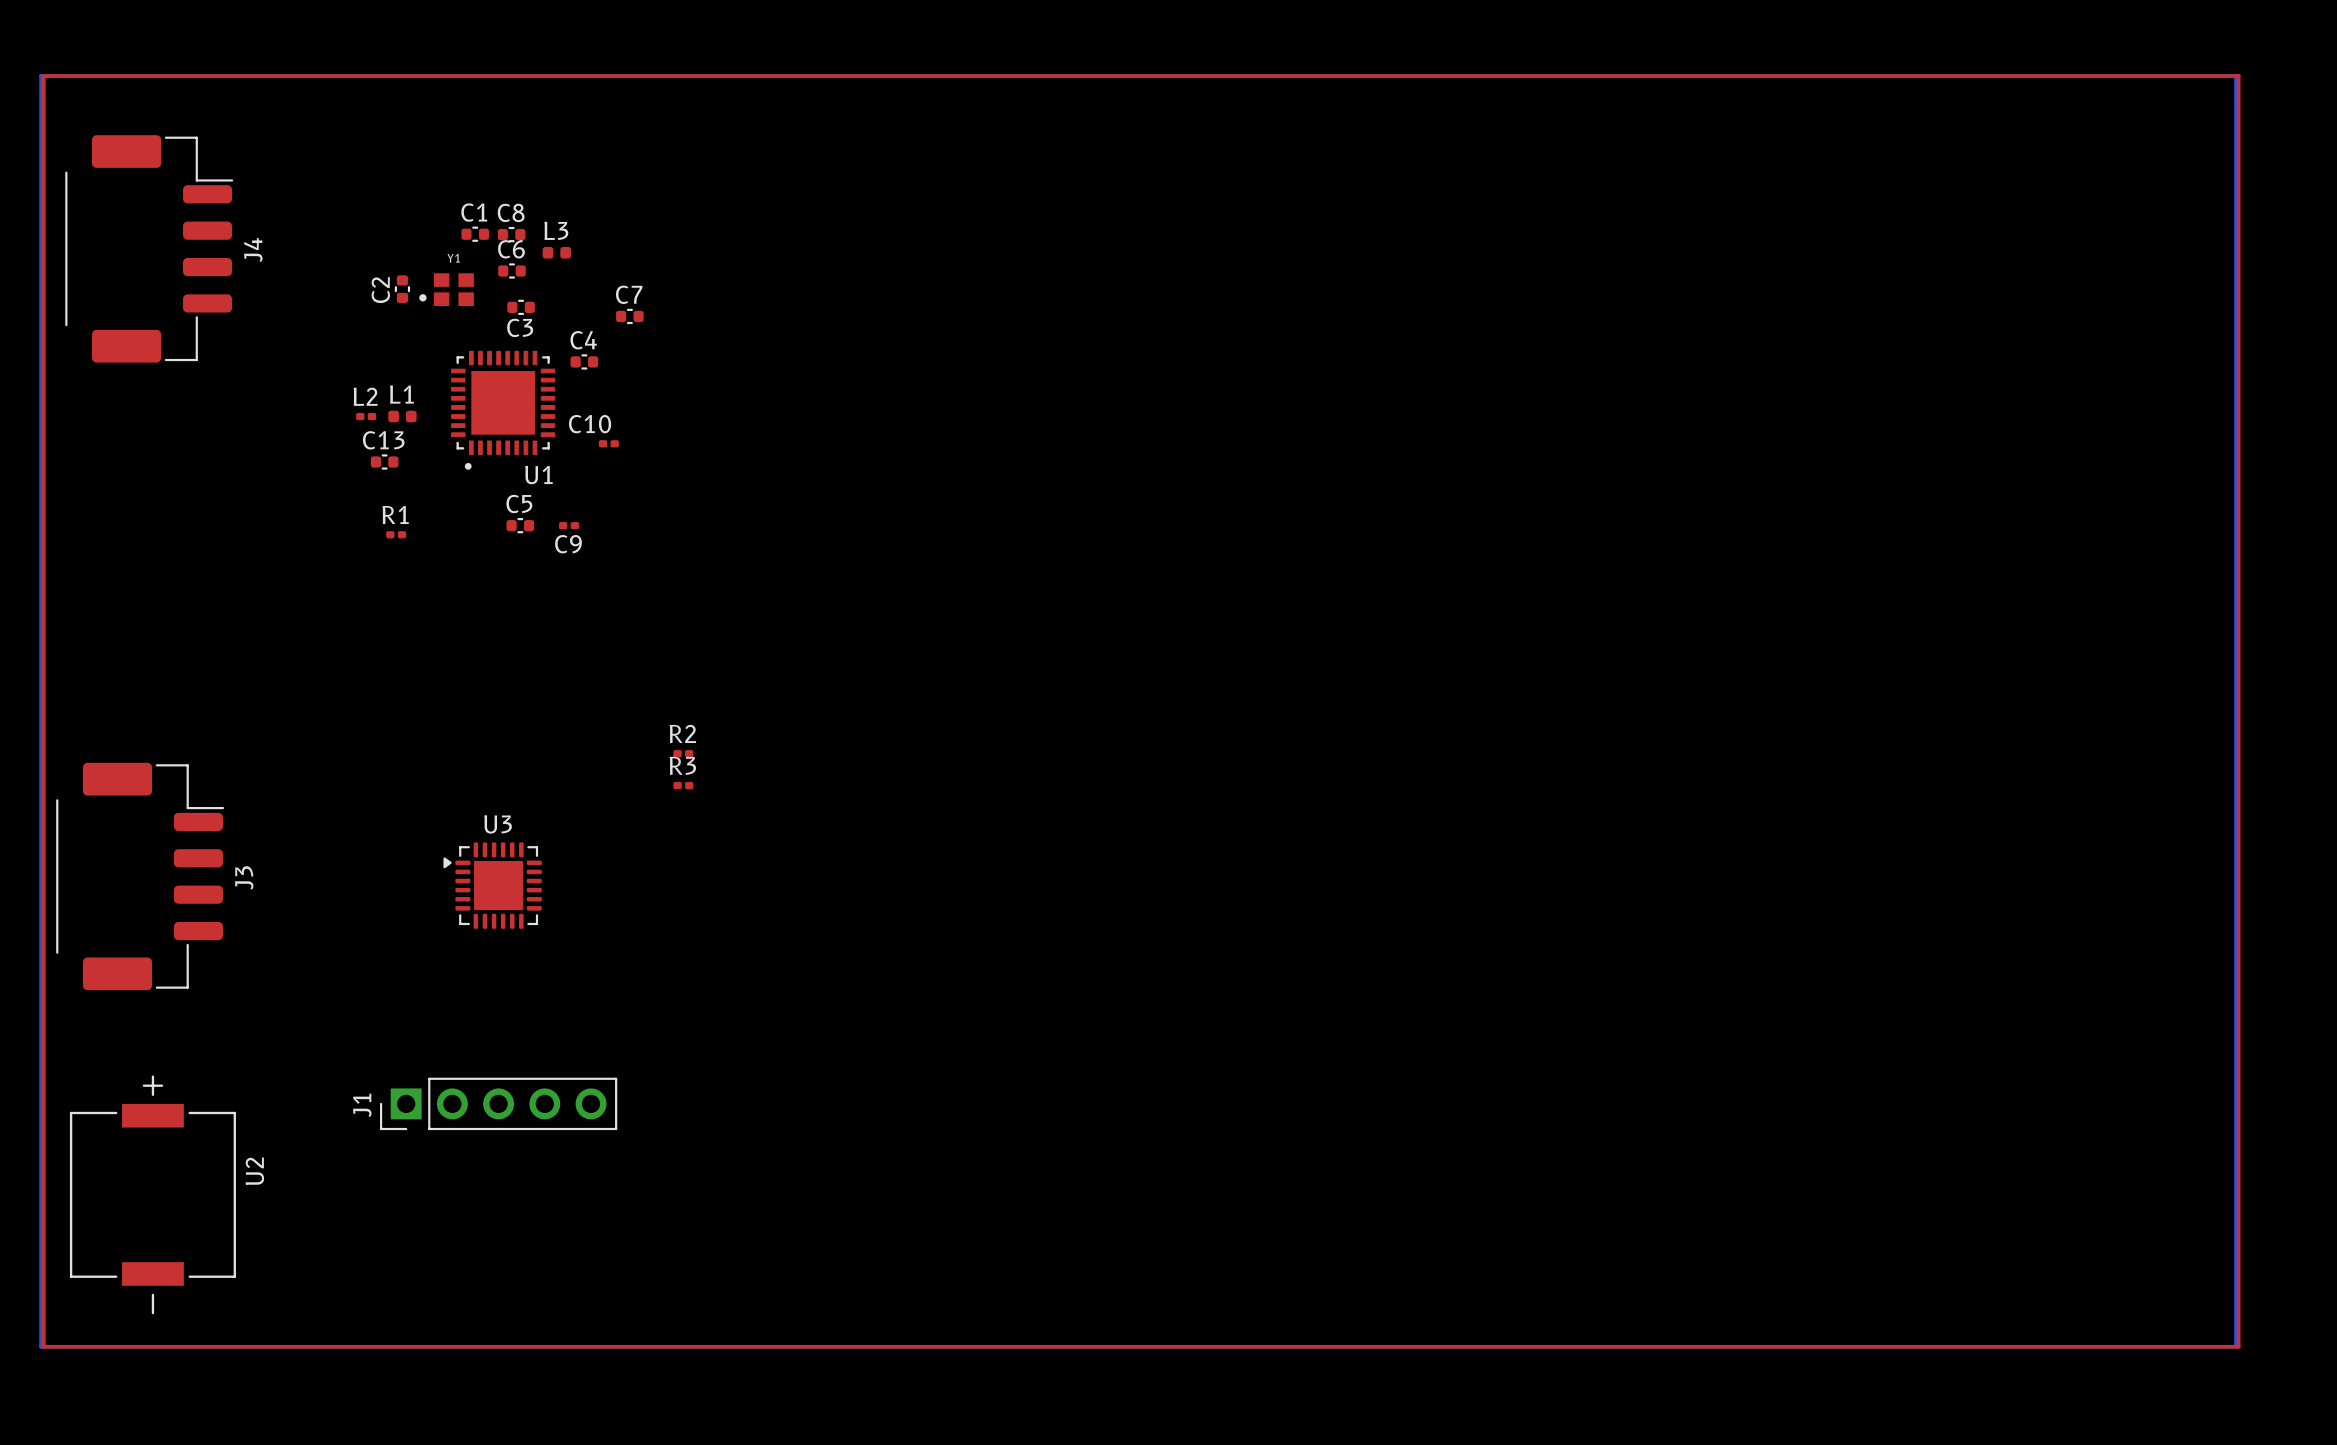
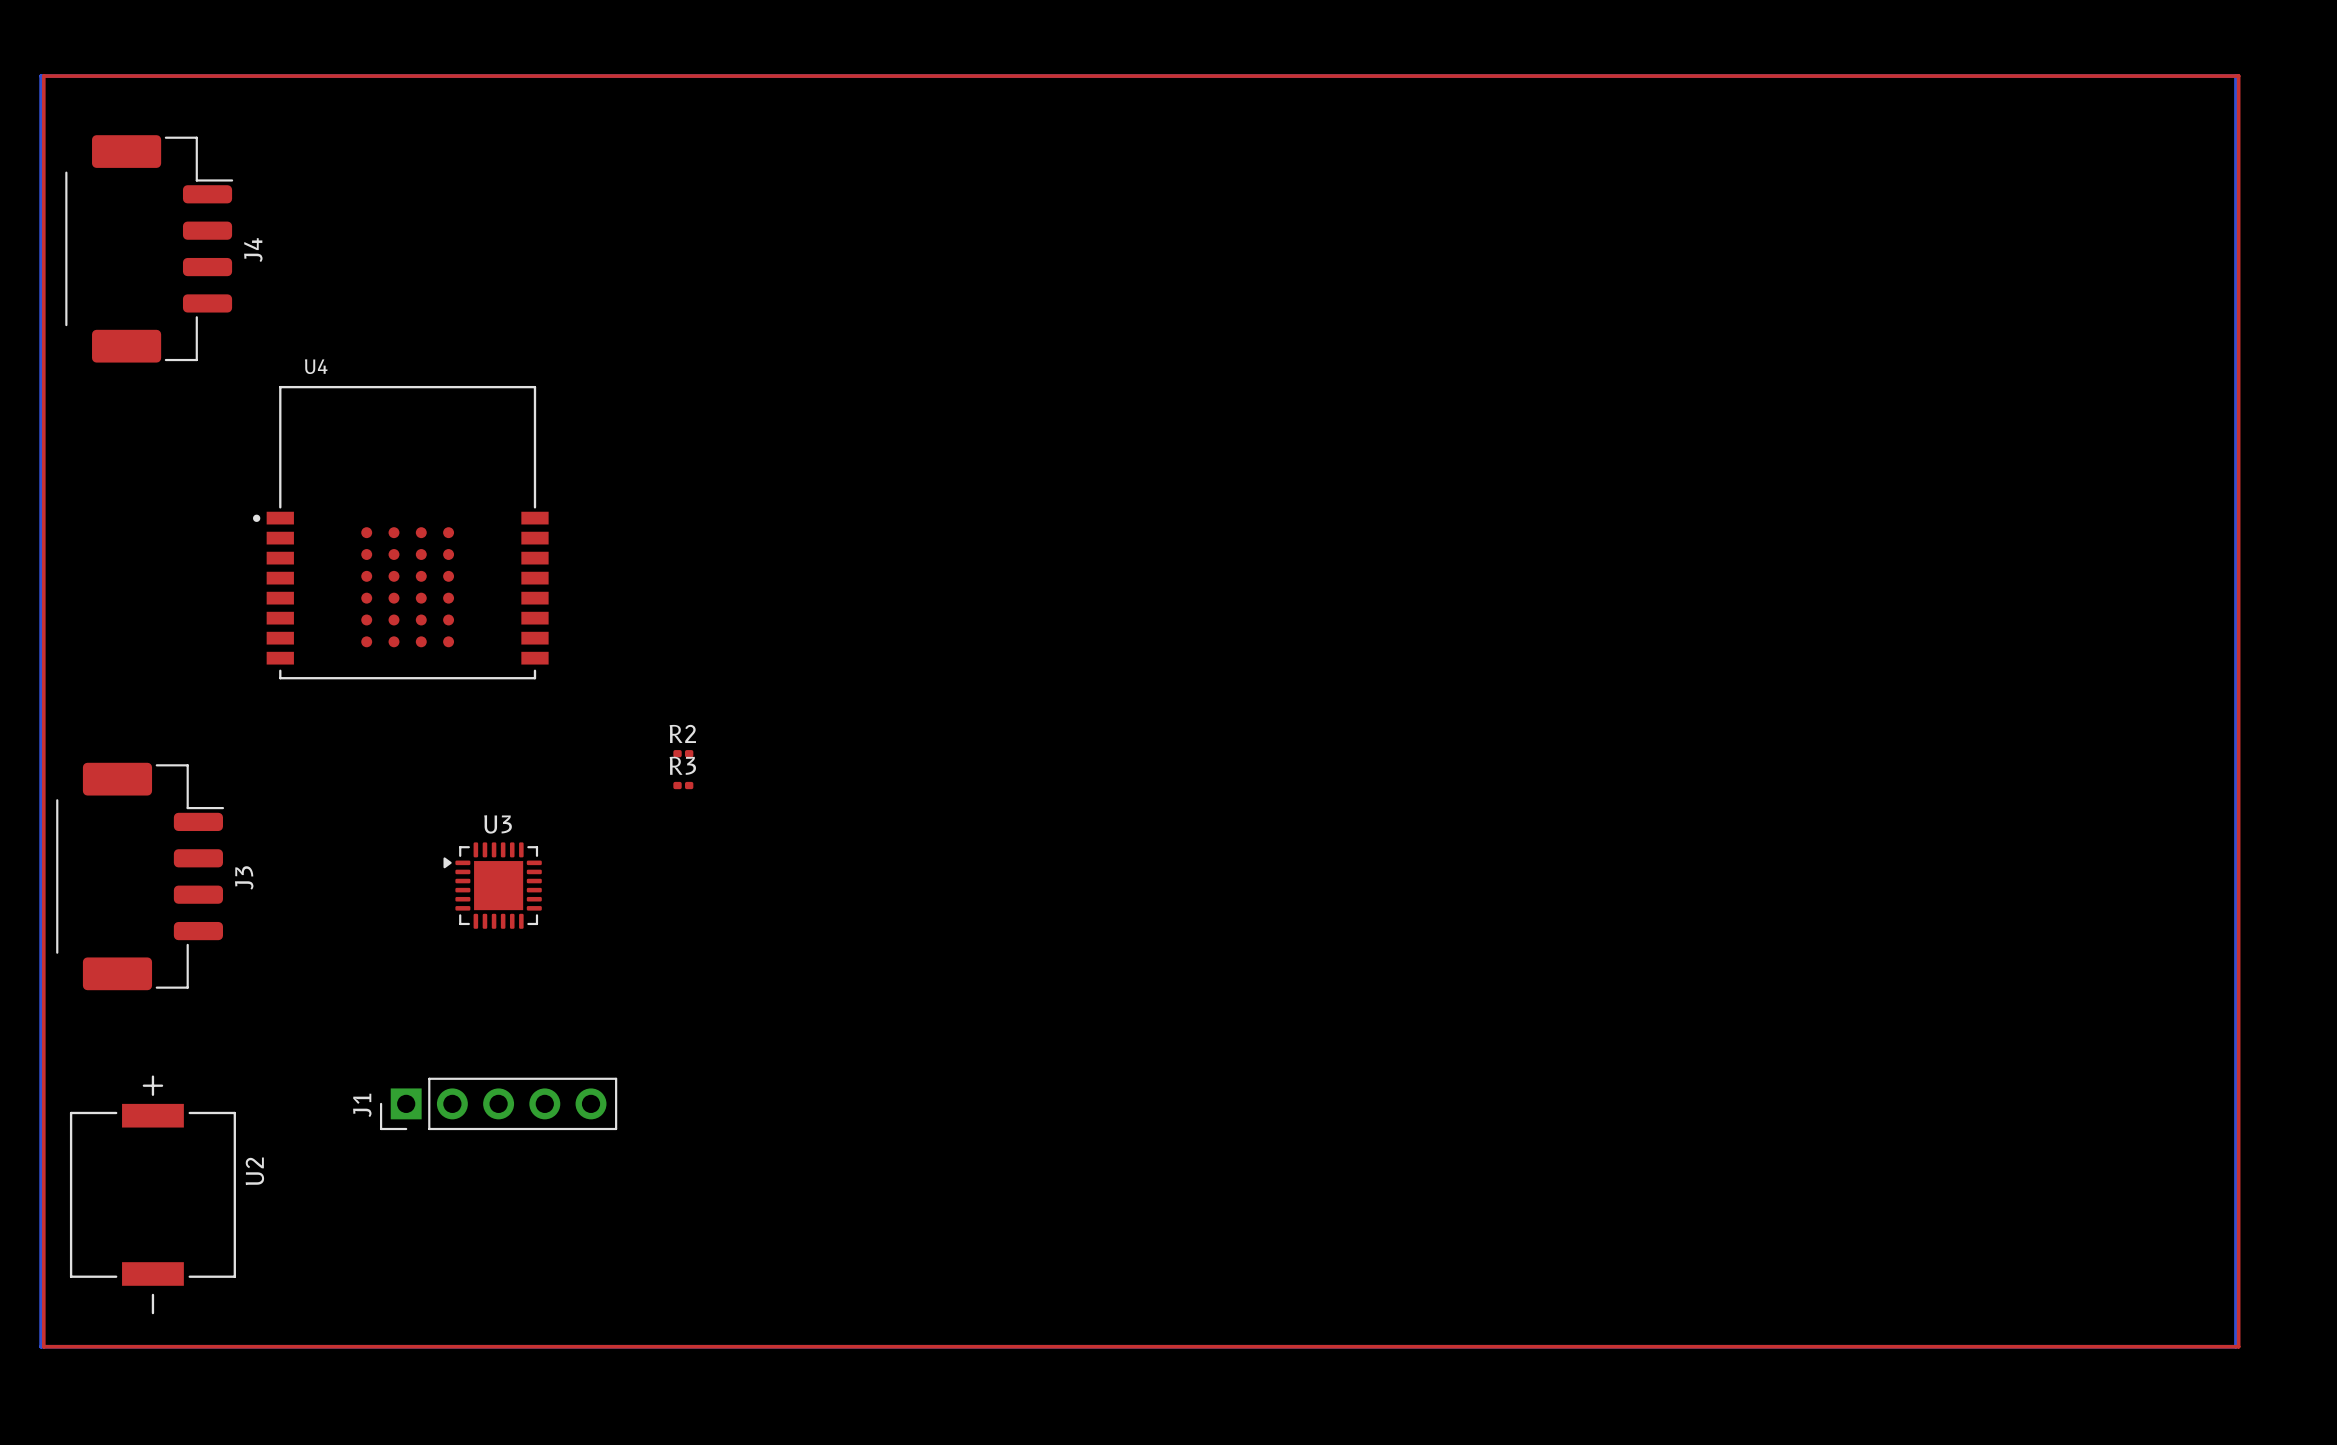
C1: (475, 234) -> none
C8: (511, 234) -> none
L3: (556, 252) -> none
C6: (511, 270) -> none
C2: (402, 289) -> none
Y1: (446, 289) -> none
C3: (521, 307) -> none
C7: (629, 316) -> none
C4: (584, 361) -> none
U1: (503, 410) -> none
L2: (366, 416) -> none
L1: (402, 416) -> none
C10: (608, 443) -> none
C13: (384, 461) -> none
C5: (520, 525) -> none
C9: (569, 525) -> none
U4: none -> (400, 532)
R1: (396, 534) -> none

